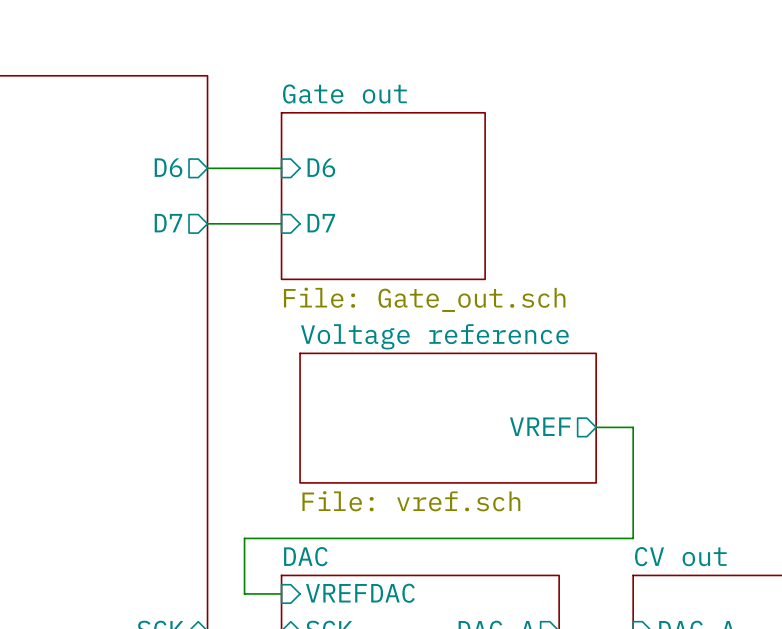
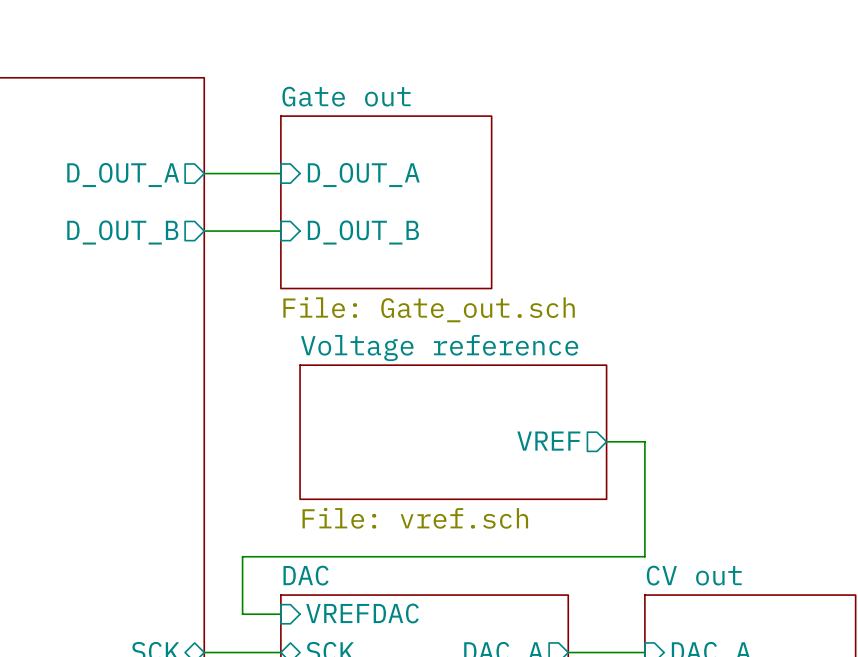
sheet pin: D6 (168, 167) -> D_OUT_A (123, 175)
sheet pin: D6 (321, 167) -> D_OUT_A (363, 175)
sheet pin: D7 (168, 223) -> D_OUT_B (122, 232)
sheet pin: D7 (321, 223) -> D_OUT_B (363, 232)

